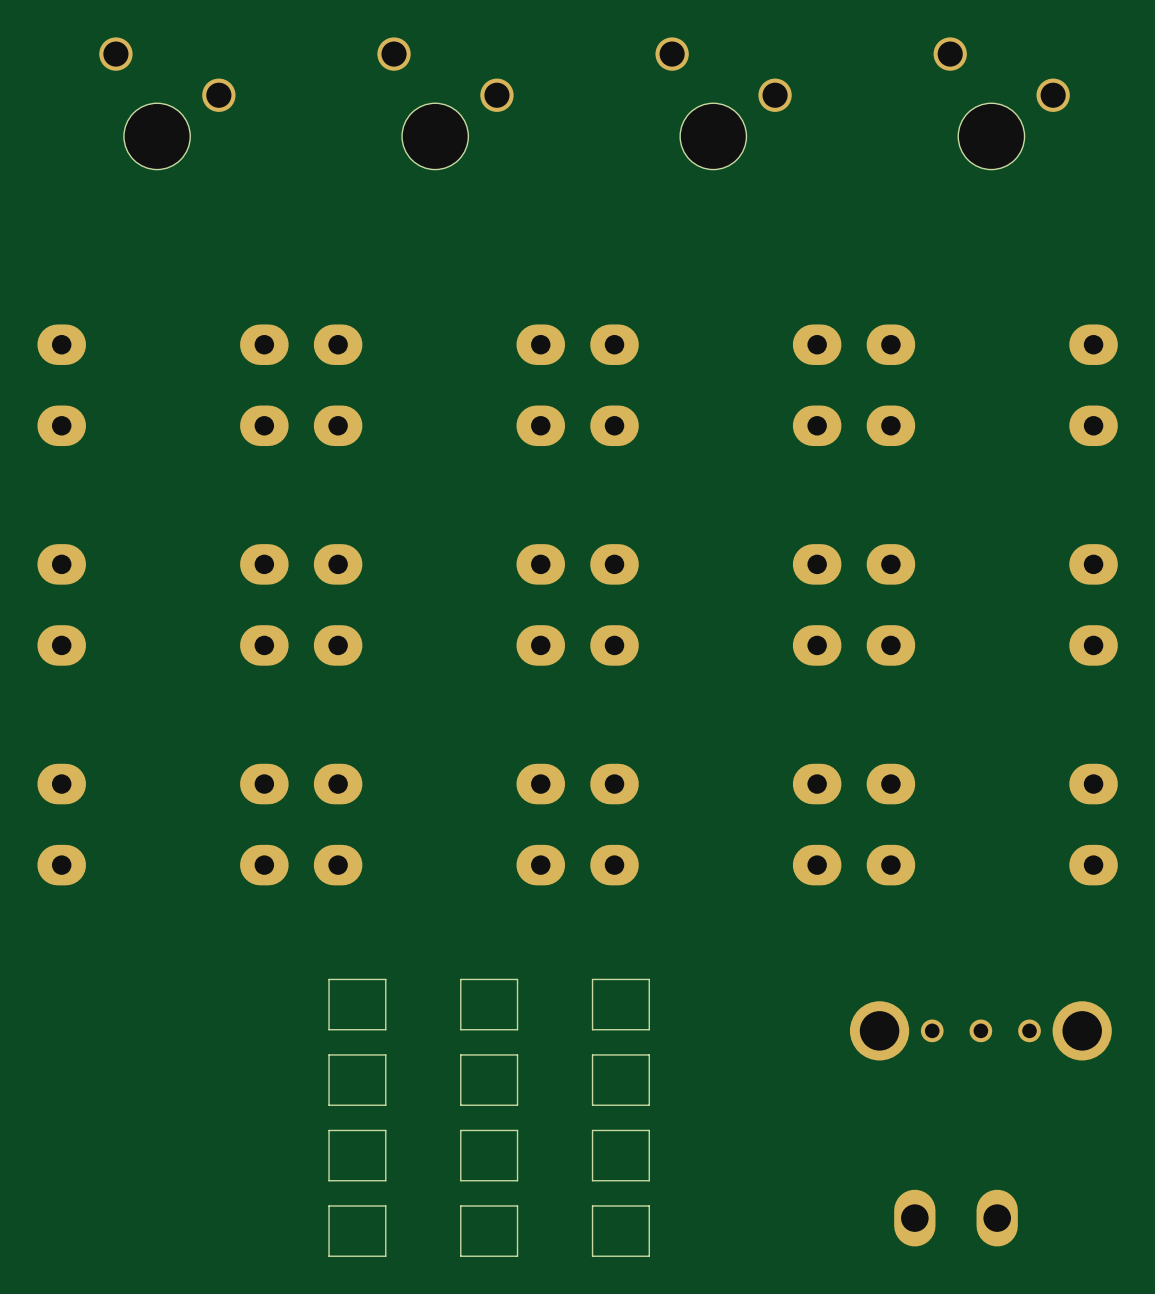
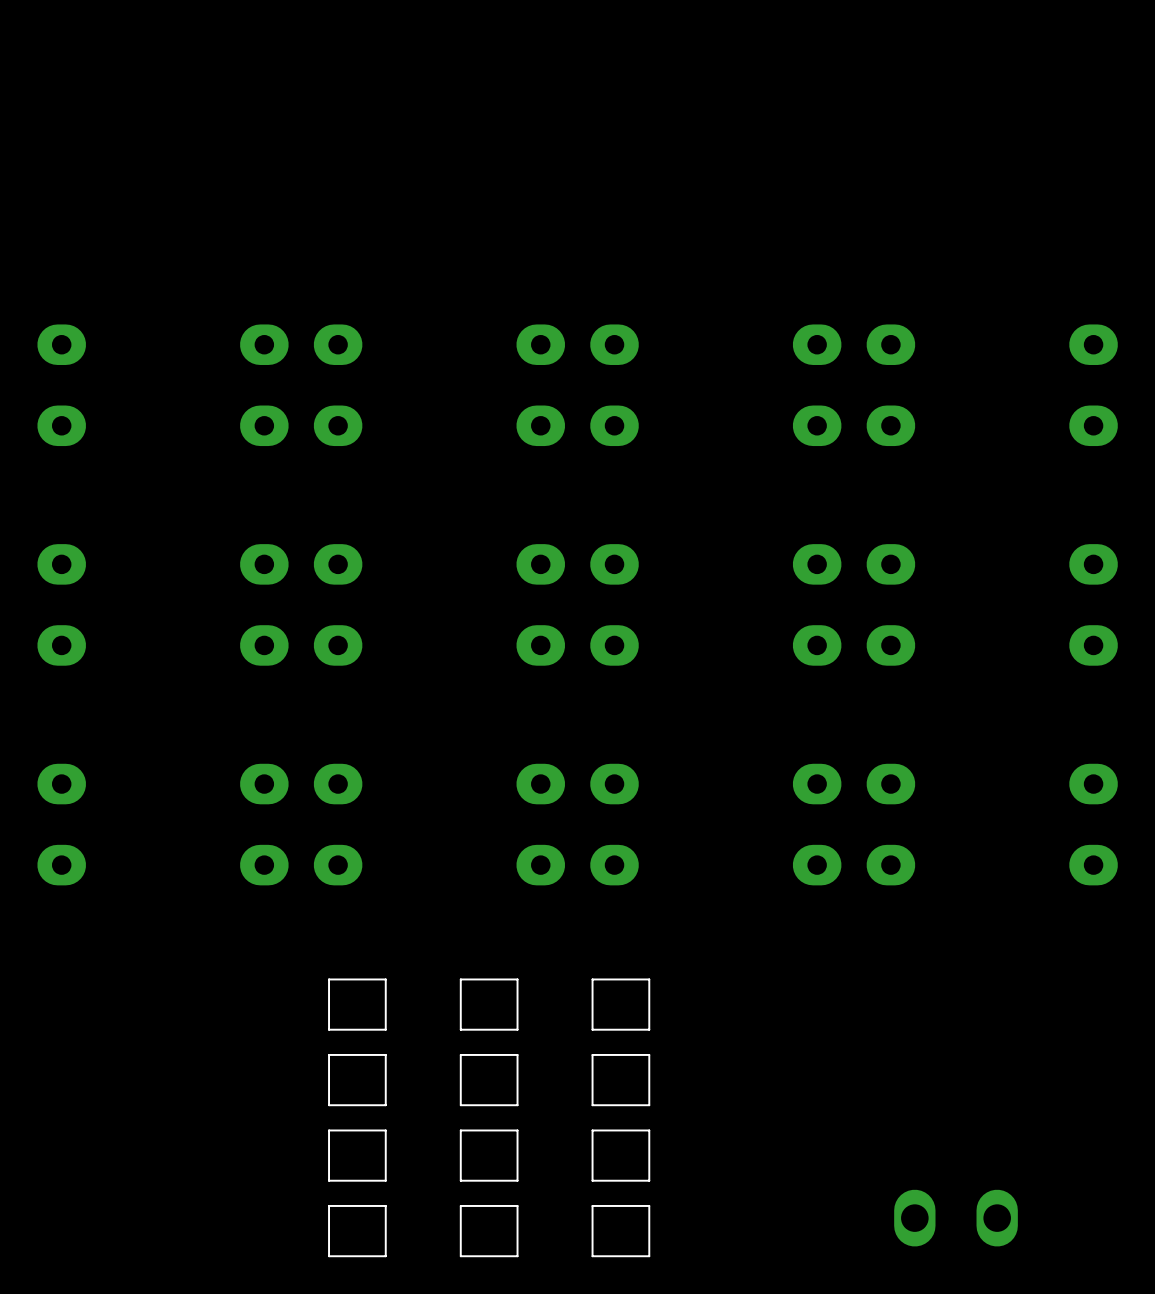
part: (167, 103) -> none
part: (445, 103) -> none
part: (723, 103) -> none
part: (1001, 103) -> none
part: (980, 1030) -> none

